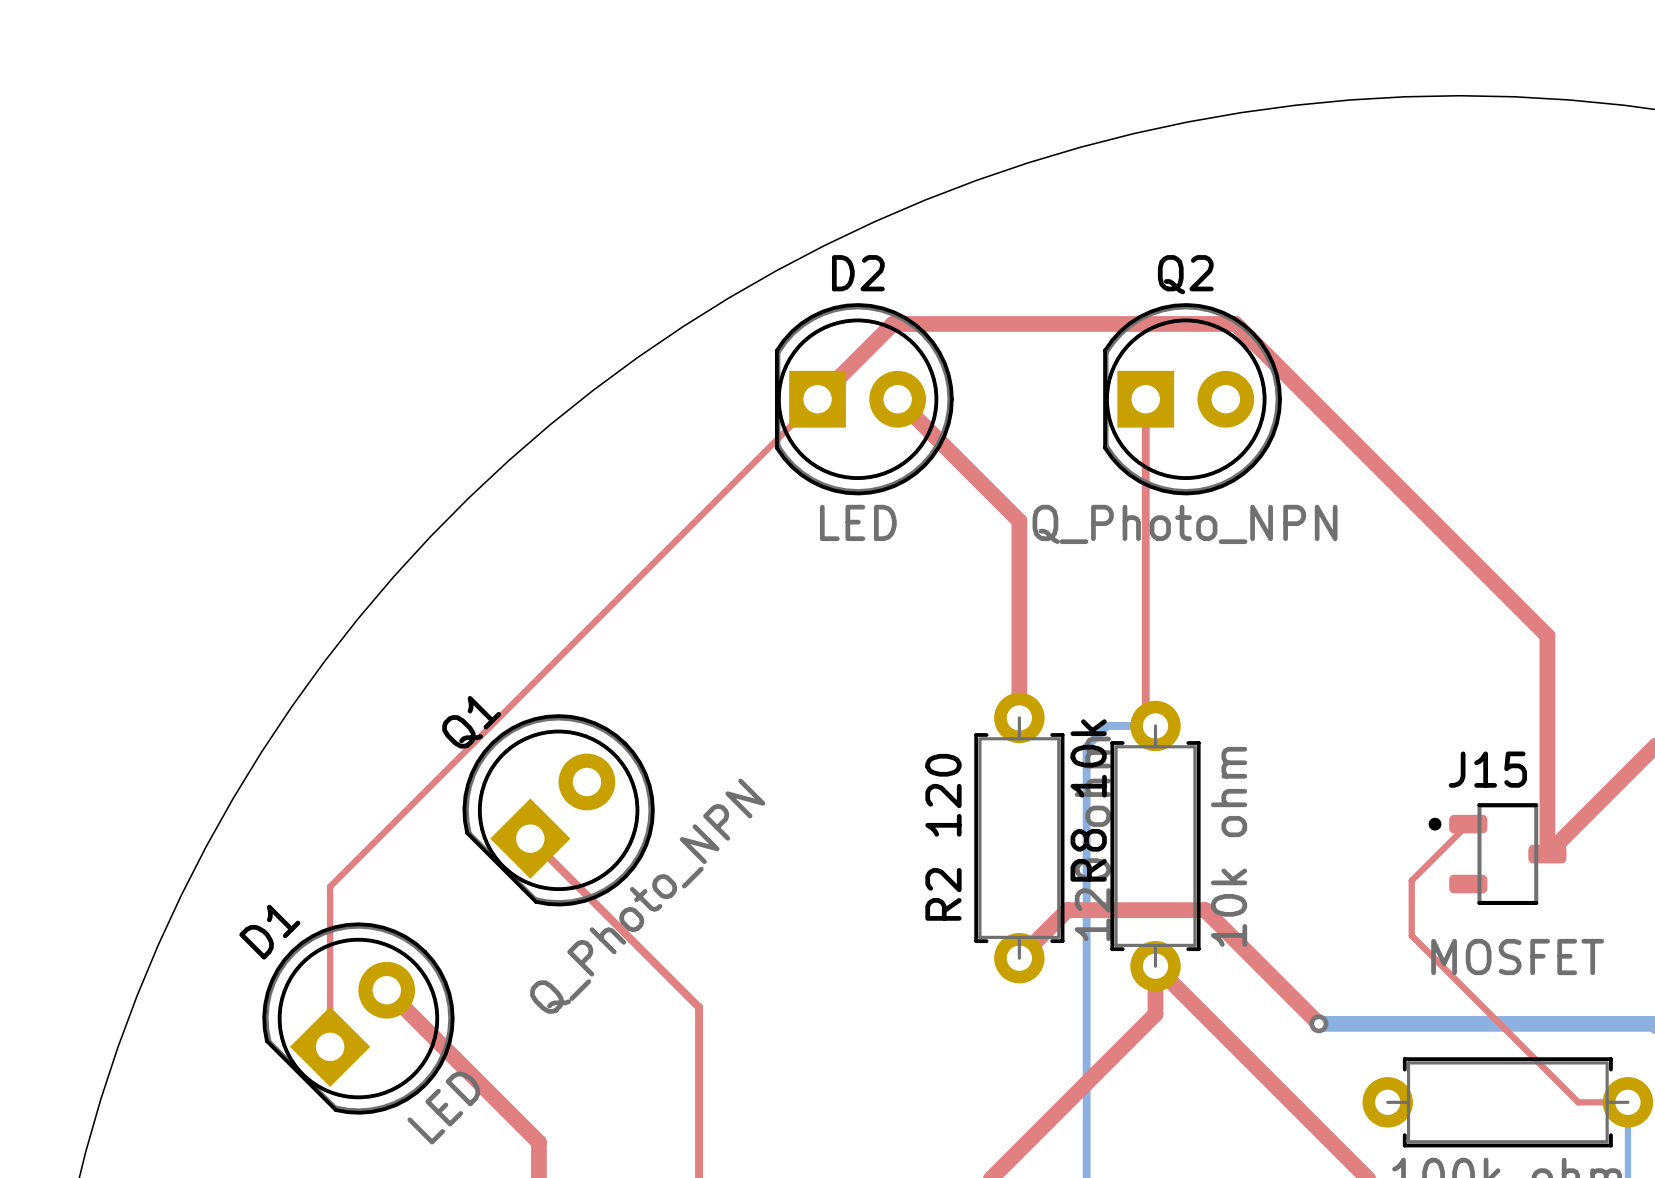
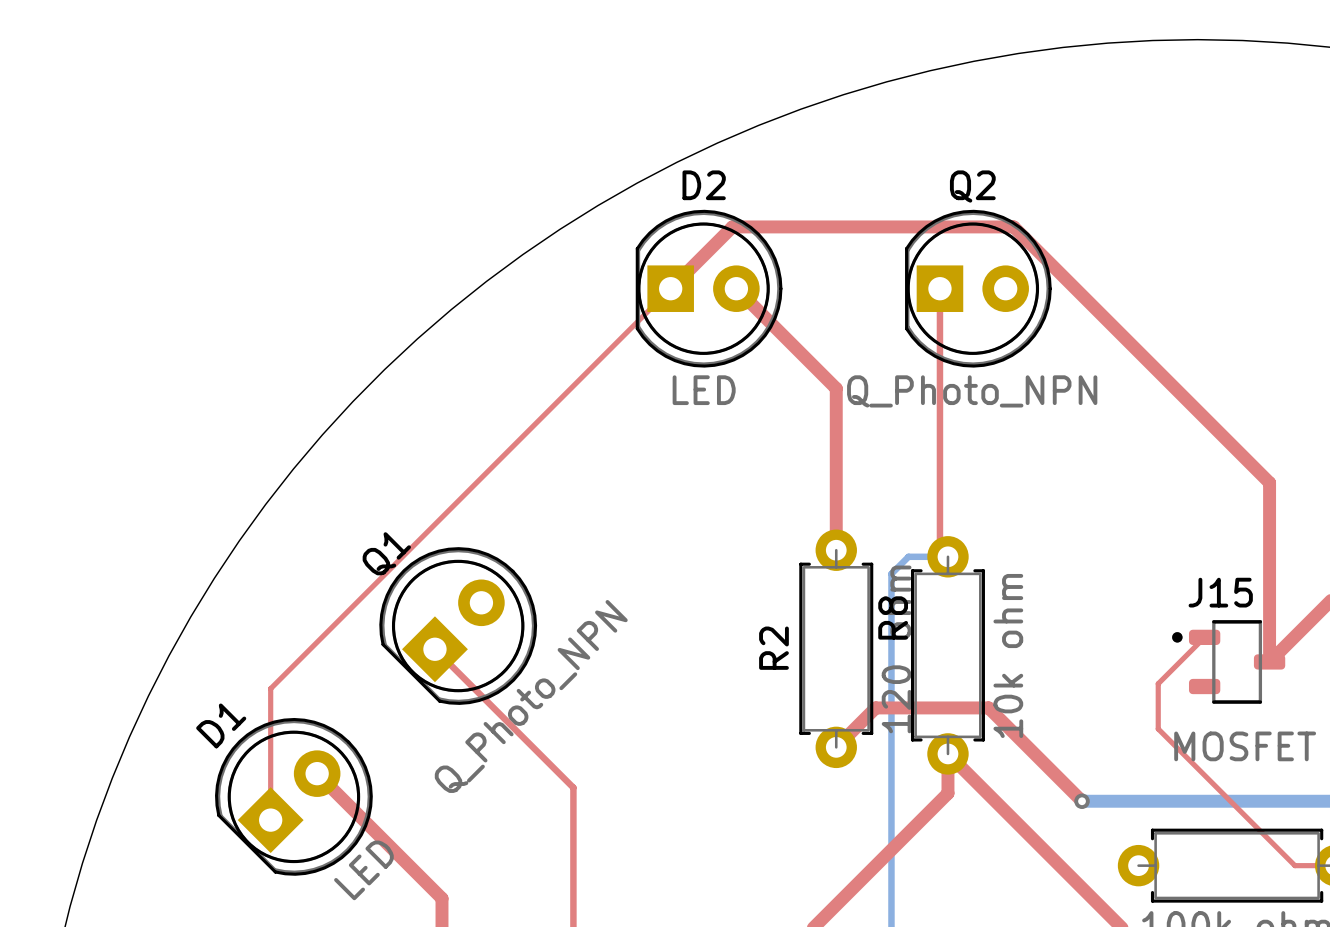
R8 10k name: R8 10k (1088, 800) -> R8 (893, 617)
R2 120 name: R2 120 (943, 837) -> R2 (773, 648)

